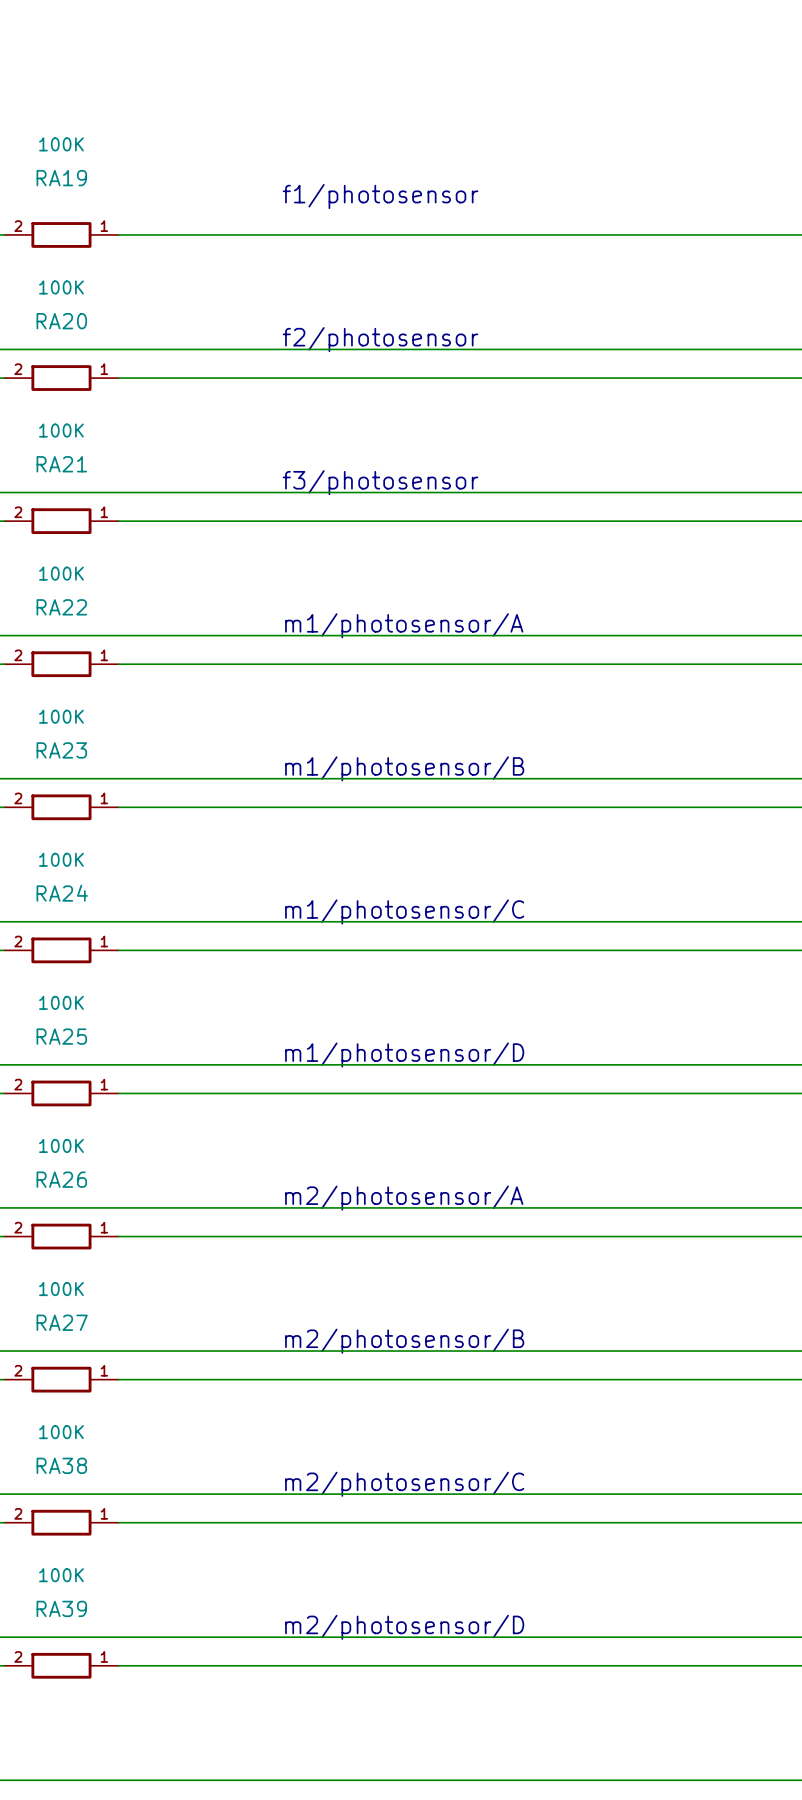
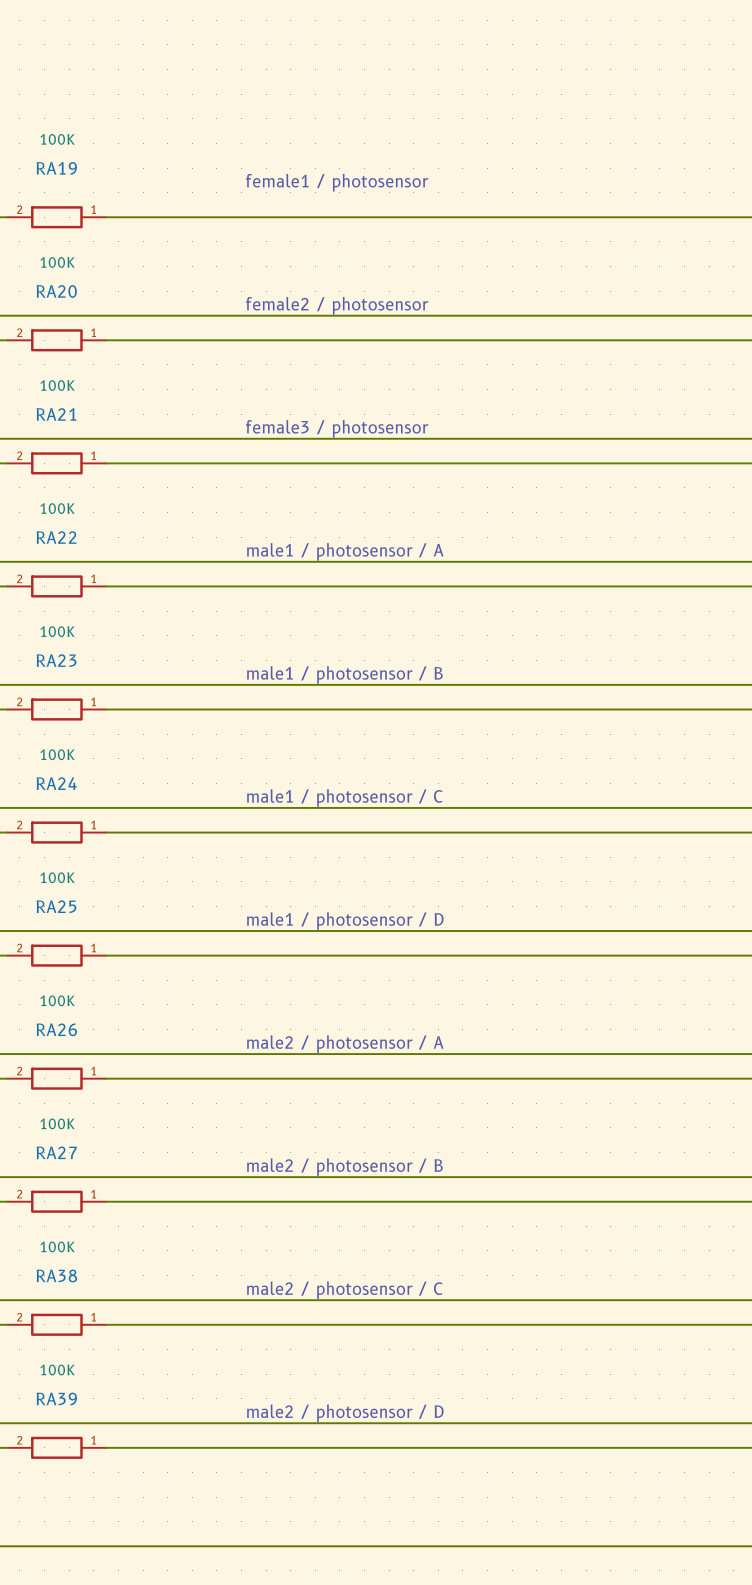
text: f1/photosensor (380, 196) -> female1 / photosensor (337, 182)
text: f2/photosensor (380, 339) -> female2 / photosensor (337, 305)
text: f3/photosensor (380, 482) -> female3 / photosensor (337, 428)
text: m1/photosensor/A (404, 625) -> male1 / photosensor / A (345, 551)
text: m1/photosensor/B (404, 768) -> male1 / photosensor / B (344, 674)
text: m1/photosensor/C (404, 911) -> male1 / photosensor / C (344, 797)
text: m1/photosensor/D (404, 1055) -> male1 / photosensor / D (345, 921)
text: m2/photosensor/A (404, 1198) -> male2 / photosensor / A (345, 1044)
text: m2/photosensor/B (404, 1341) -> male2 / photosensor / B (344, 1167)
text: m2/photosensor/C (404, 1484) -> male2 / photosensor / C (344, 1290)
text: m2/photosensor/D (404, 1627) -> male2 / photosensor / D (345, 1413)

